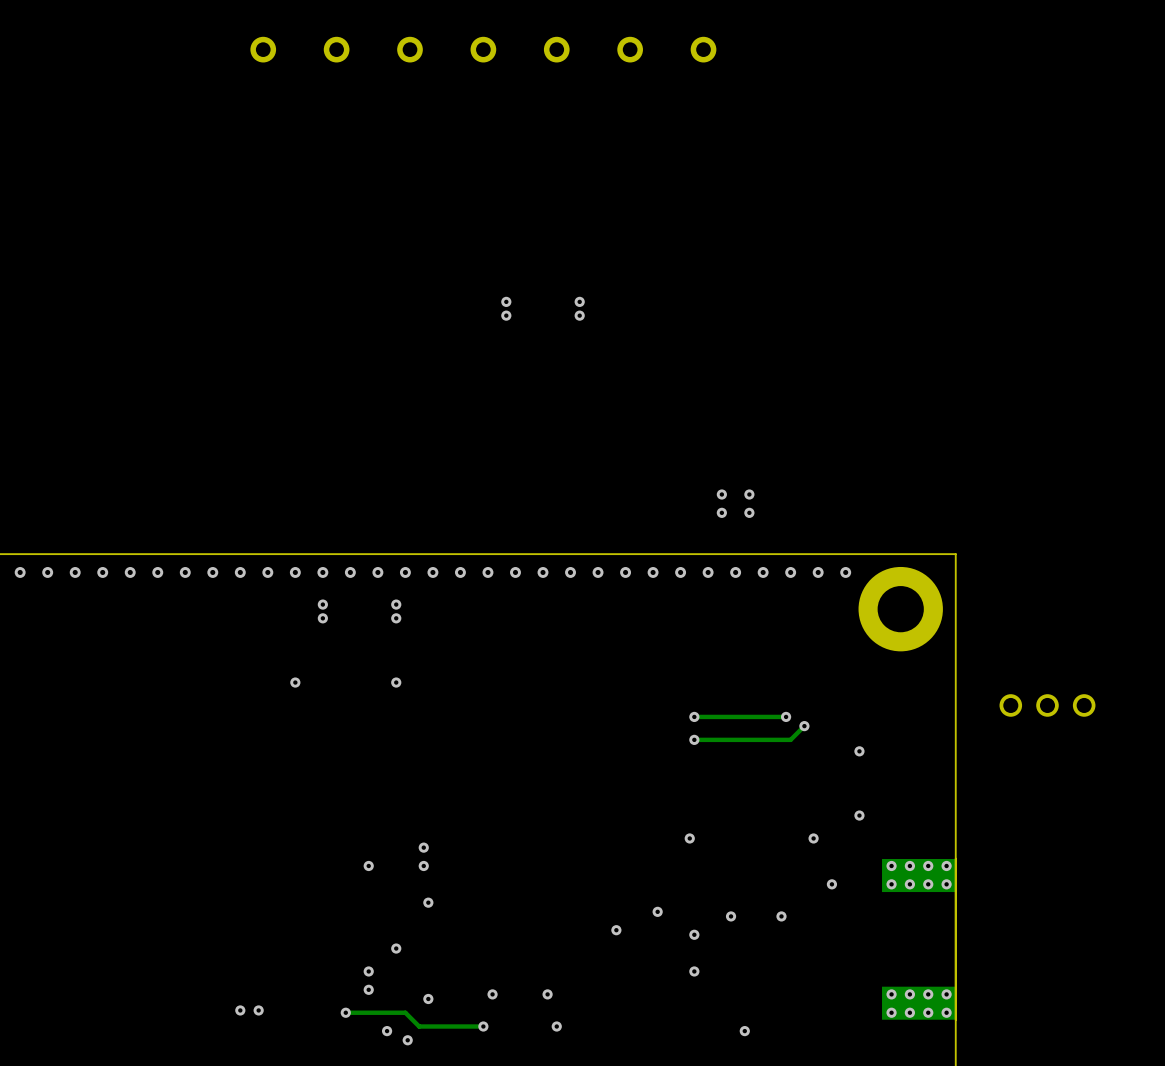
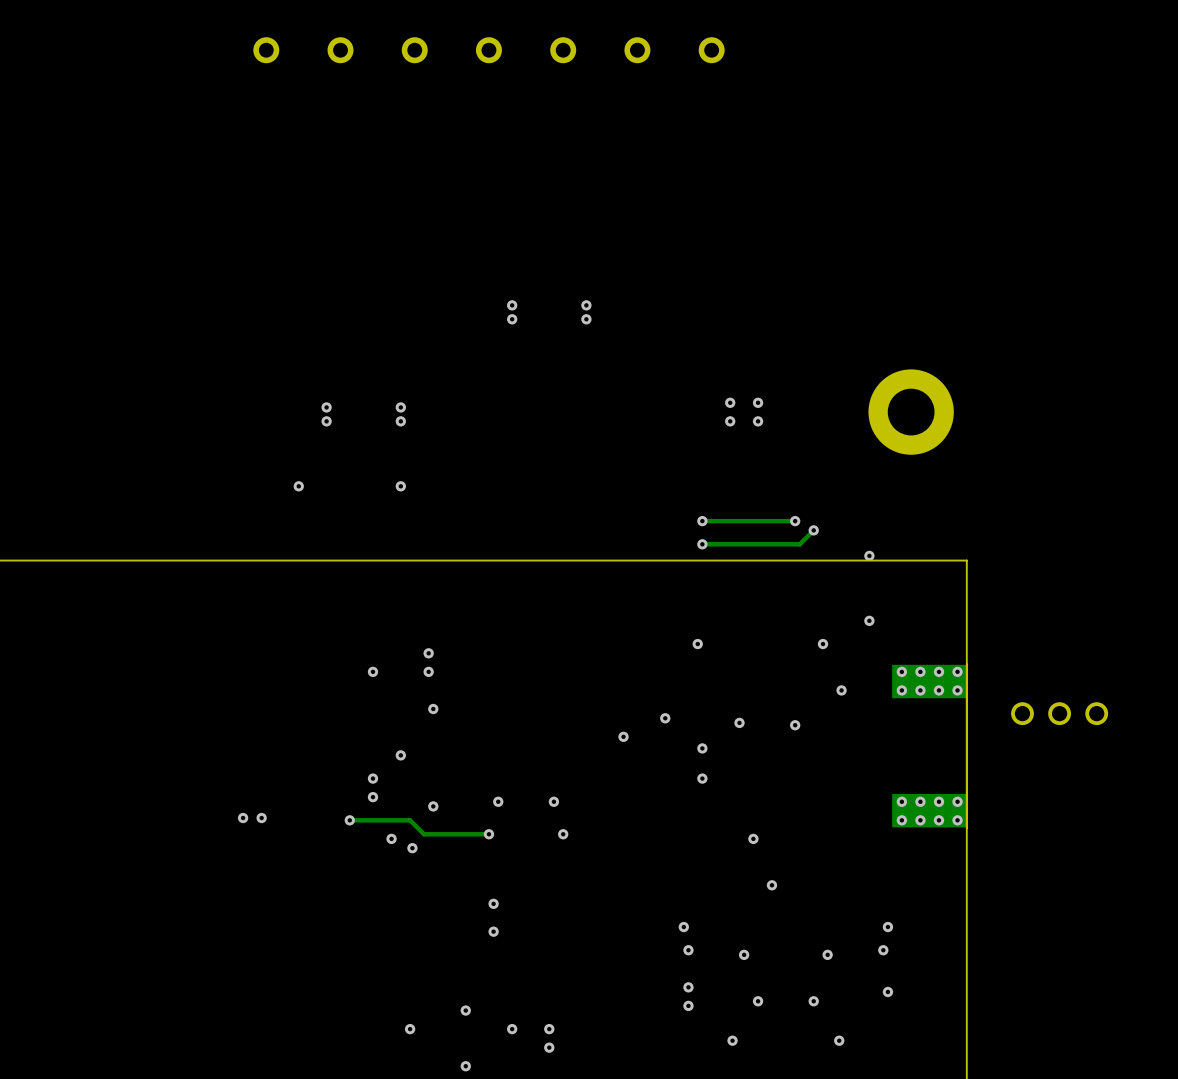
via: none -> (730, 402)
via: none -> (758, 402)
via: none -> (326, 407)
via: none -> (400, 407)
via: none -> (326, 421)
via: none -> (400, 421)
via: none -> (730, 421)
via: none -> (758, 421)
via: none -> (298, 486)
via: none -> (400, 486)
via: (721, 494) -> none
via: (749, 494) -> none
via: (721, 512) -> none
via: (749, 512) -> none
via: none -> (702, 521)
via: none -> (795, 521)
via: none -> (813, 530)
via: none -> (702, 544)
via: none -> (869, 555)
via: (20, 572) -> none
via: (47, 572) -> none
via: (75, 572) -> none
via: (102, 572) -> none
via: (130, 572) -> none
via: (157, 572) -> none
via: (185, 572) -> none
via: (212, 572) -> none
via: (240, 572) -> none
via: (267, 572) -> none
via: (295, 572) -> none
via: (322, 572) -> none
via: (350, 572) -> none
via: (377, 572) -> none
via: (405, 572) -> none
via: (432, 572) -> none
via: (460, 572) -> none
via: (487, 572) -> none
via: (515, 572) -> none
via: (543, 572) -> none
via: (570, 572) -> none
via: (598, 572) -> none
via: (625, 572) -> none
via: (653, 572) -> none
via: (680, 572) -> none
via: (708, 572) -> none
via: (735, 572) -> none
via: (763, 572) -> none
via: (790, 572) -> none
via: (818, 572) -> none
via: (845, 572) -> none
via: (322, 604) -> none
via: (396, 604) -> none
part position: (900, 609) -> (911, 412)
via: none -> (869, 620)
via: (322, 618) -> none
via: (396, 618) -> none
via: none -> (697, 644)
via: none -> (823, 644)
via: none -> (428, 653)
via: none -> (372, 671)
via: none -> (428, 671)
via: none -> (901, 671)
via: none -> (920, 671)
via: none -> (938, 671)
via: none -> (957, 671)
via: (295, 682) -> none
via: (396, 682) -> none
via: none -> (841, 690)
via: none -> (901, 690)
via: none -> (920, 690)
via: none -> (938, 690)
via: none -> (957, 690)
via: none -> (433, 708)
via: none -> (665, 718)
via: none -> (739, 722)
via: (694, 716) -> none
track: (786, 716) (694, 716) -> (795, 521) (702, 521)
track: (804, 726) (790, 739) (694, 739) -> (813, 530) (799, 544) (702, 544)
via: (804, 726) -> none
via: none -> (623, 736)
part: none -> (929, 746)
via: none -> (400, 755)
via: (859, 751) -> none
via: none -> (372, 778)
via: none -> (702, 778)
via: none -> (372, 797)
via: none -> (498, 801)
via: none -> (553, 801)
via: none -> (901, 801)
via: none -> (920, 801)
via: none -> (938, 801)
via: none -> (957, 801)
via: none -> (433, 806)
via: none -> (243, 818)
via: none -> (261, 818)
via: none -> (349, 820)
via: none -> (901, 820)
via: none -> (920, 820)
via: none -> (938, 820)
via: none -> (957, 820)
via: (859, 815) -> none
via: none -> (488, 834)
via: none -> (563, 834)
via: none -> (391, 838)
via: none -> (753, 838)
via: none -> (412, 848)
via: (689, 838) -> none
via: (813, 838) -> none
via: (423, 847) -> none
via: (368, 865) -> none
via: (423, 865) -> none
via: (891, 865) -> none
via: (909, 865) -> none
via: (928, 865) -> none
via: (946, 865) -> none
via: none -> (771, 885)
via: (831, 884) -> none
via: (891, 884) -> none
via: (909, 884) -> none
via: (928, 884) -> none
via: (946, 884) -> none
via: none -> (493, 903)
via: (428, 902) -> none
via: (657, 911) -> none
via: none -> (683, 927)
via: (731, 916) -> none
via: (781, 916) -> none
via: none -> (887, 927)
via: none -> (493, 931)
via: (616, 930) -> none
via: (694, 934) -> none
via: none -> (688, 950)
via: none -> (883, 950)
part: (918, 939) -> none
via: none -> (744, 954)
via: none -> (827, 954)
via: (396, 948) -> none
via: (368, 971) -> none
via: (694, 971) -> none
via: none -> (688, 987)
via: none -> (887, 991)
via: (368, 989) -> none
via: none -> (758, 1001)
via: none -> (813, 1001)
via: (492, 994) -> none
via: (547, 994) -> none
via: none -> (688, 1005)
via: (891, 994) -> none
via: (909, 994) -> none
via: (928, 994) -> none
via: (946, 994) -> none
via: (428, 998) -> none
via: none -> (465, 1010)
via: (240, 1010) -> none
via: (258, 1010) -> none
track: (345, 1012) (405, 1012) (419, 1026) (483, 1026) -> (349, 820) (410, 820) (424, 834) (488, 834)
via: (345, 1012) -> none
via: (891, 1012) -> none
via: (909, 1012) -> none
via: (928, 1012) -> none
via: (946, 1012) -> none
via: none -> (410, 1029)
via: none -> (512, 1029)
via: none -> (549, 1029)
via: (483, 1026) -> none
via: (556, 1026) -> none
via: none -> (732, 1040)
via: none -> (839, 1040)
via: (387, 1031) -> none
via: (744, 1031) -> none
via: none -> (549, 1047)
via: (407, 1040) -> none
via: none -> (465, 1066)

